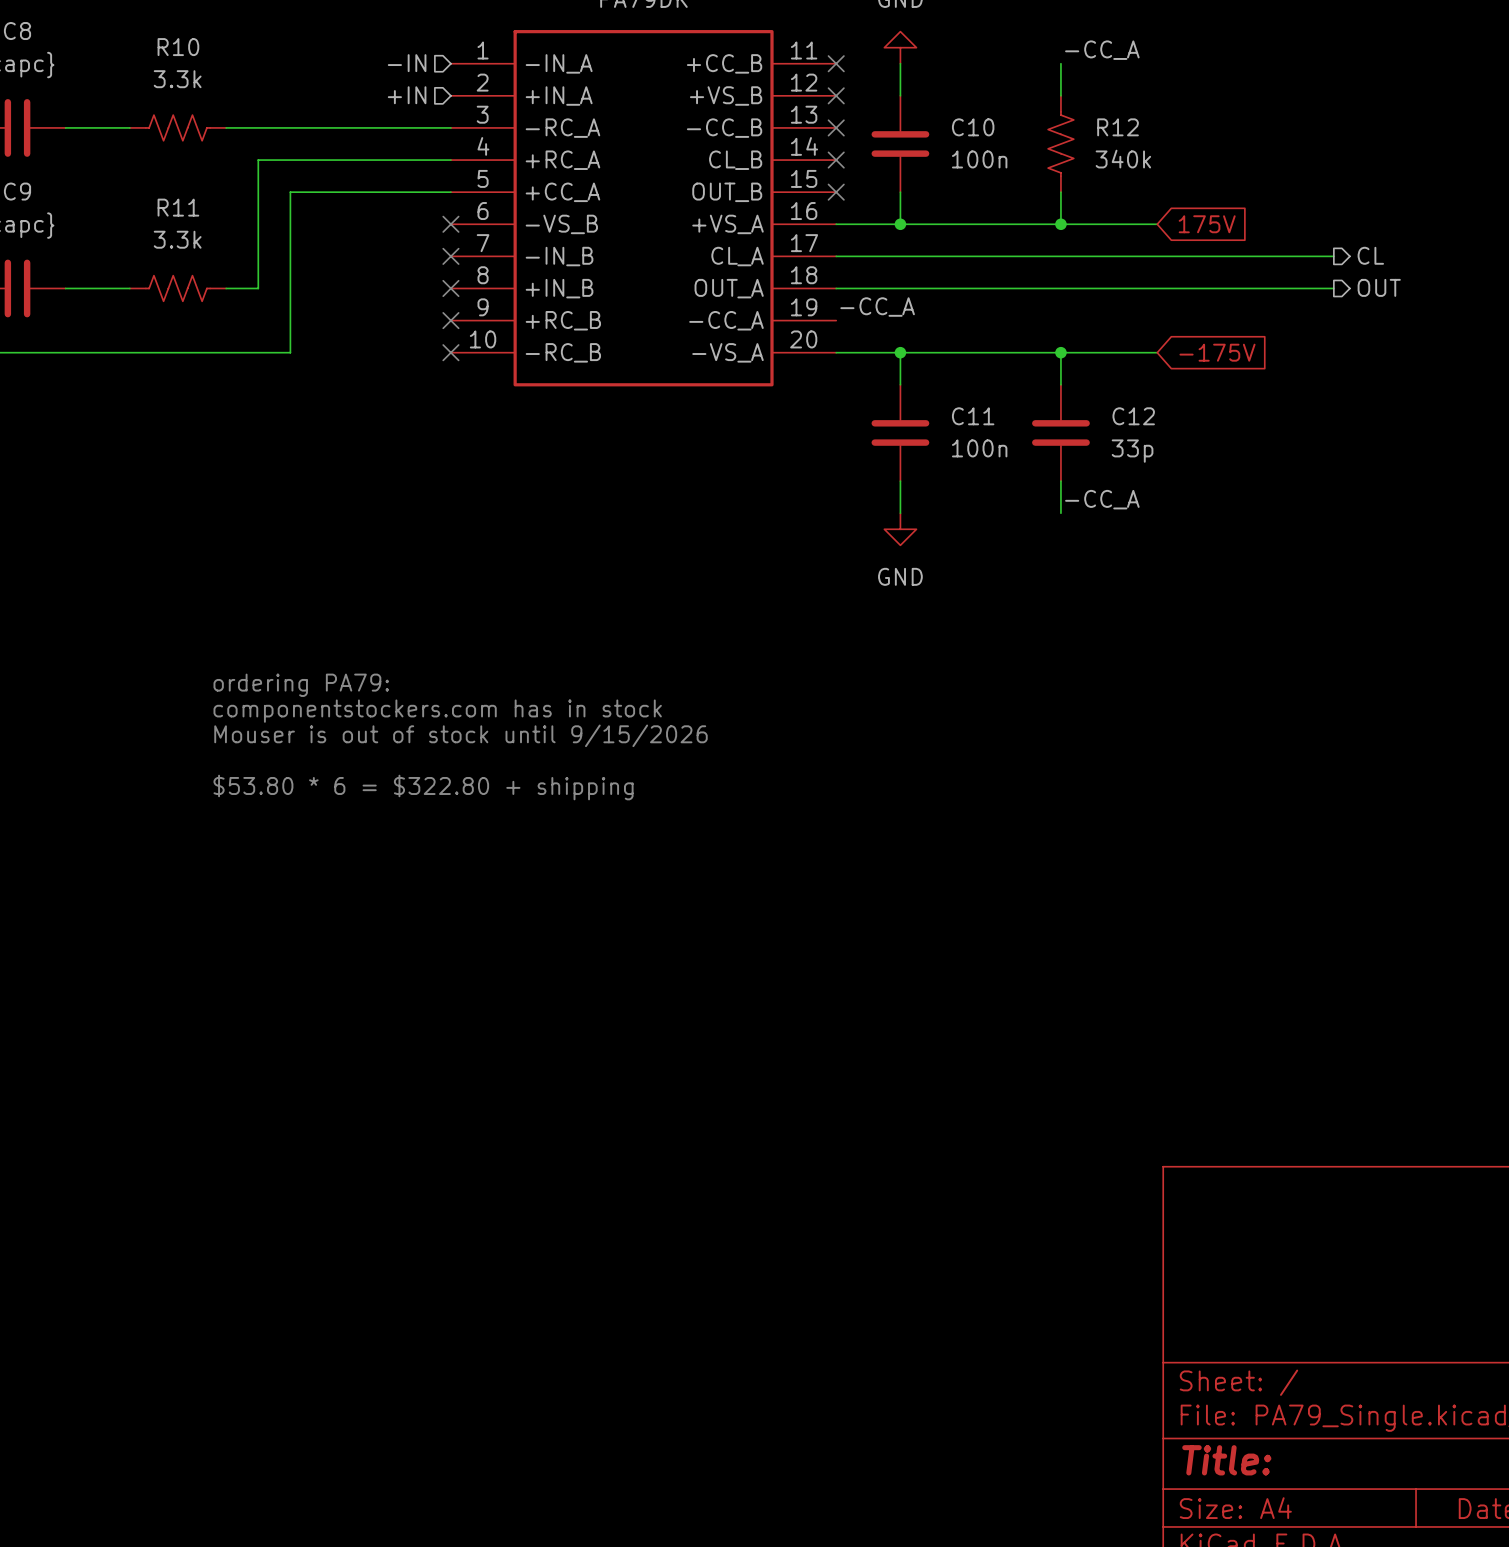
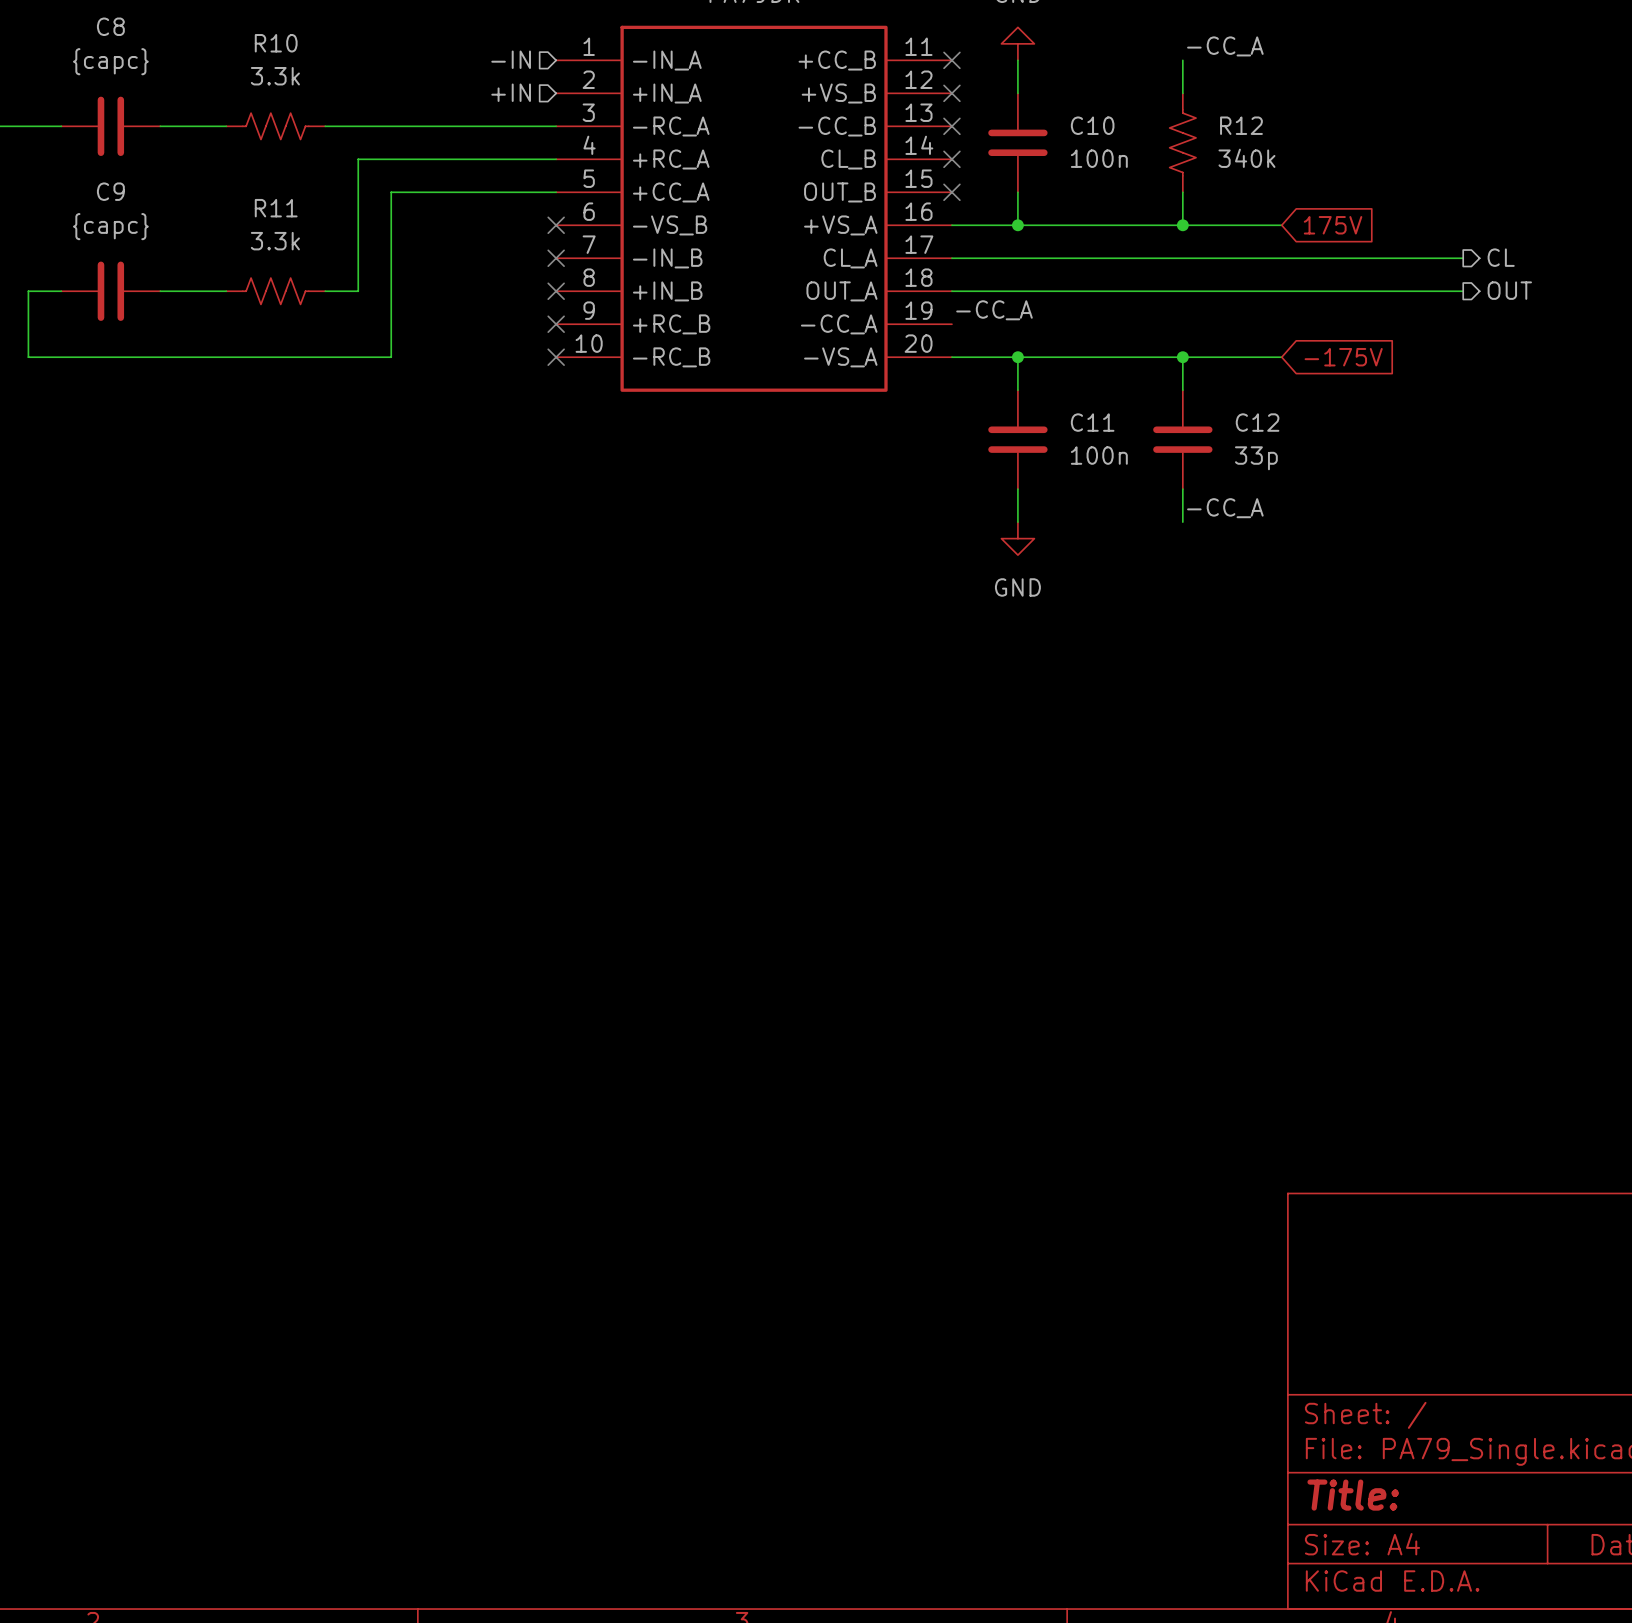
text: ordering PA79: (301, 685) -> none
text: componentstockers.com has in stock (437, 711) -> none
text: Mouser is out of stock until 9/15/2026 (460, 735) -> none
text: $53.80 * 6 = $322.80 + shipping (423, 787) -> none

